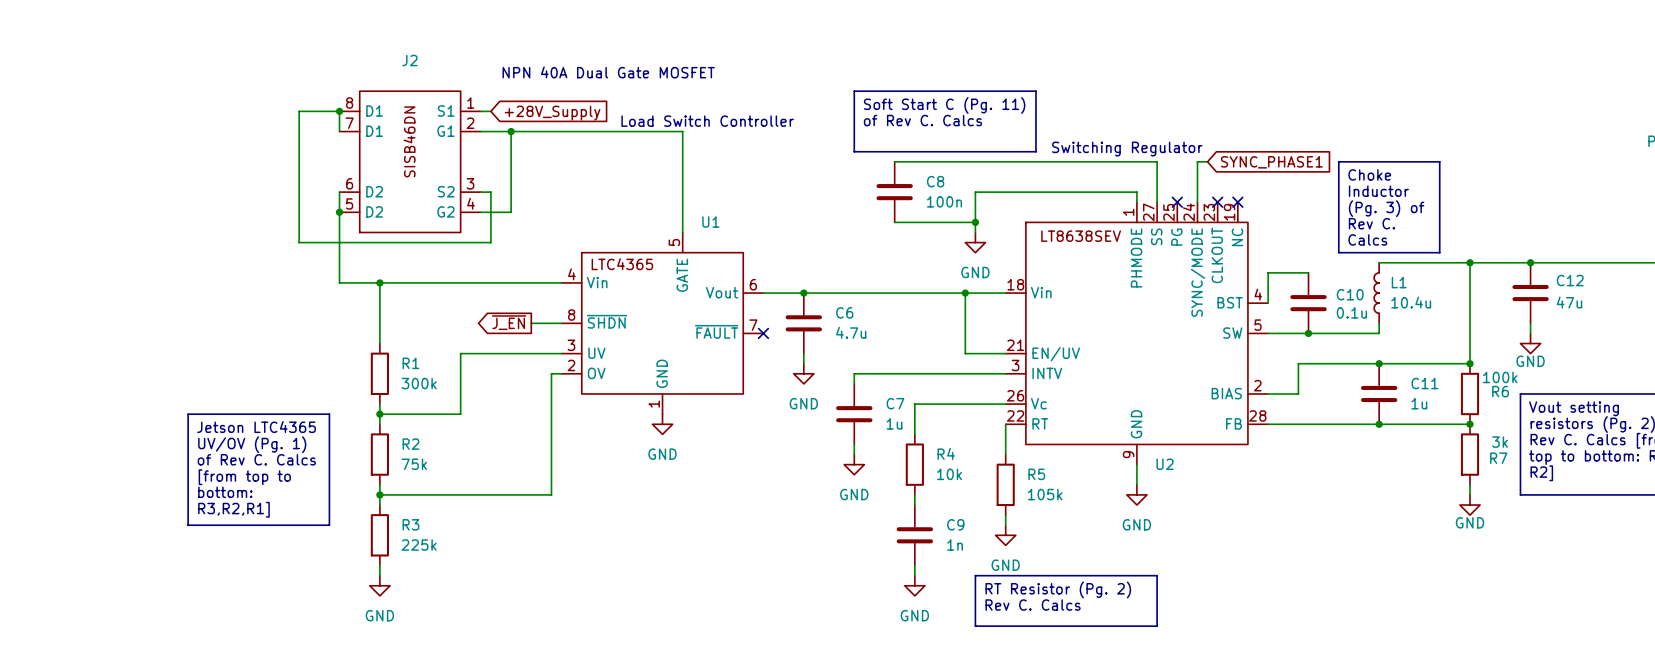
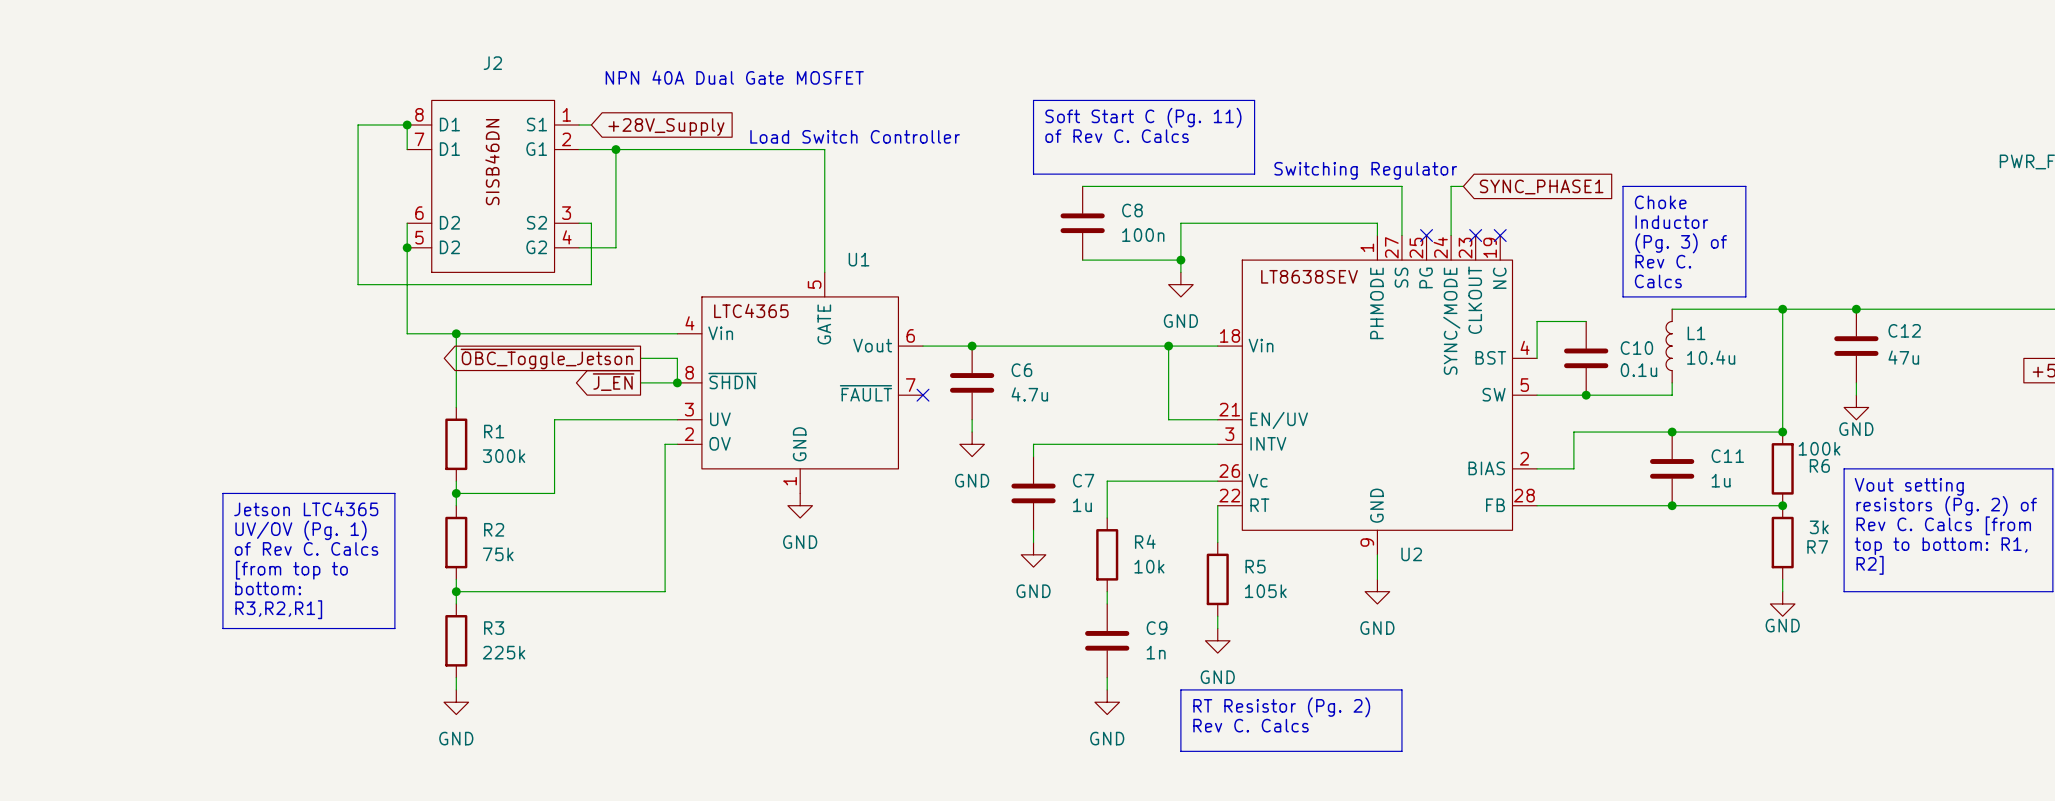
global label: none -> ~{OBC_Toggle_Jetson} (547, 358)
wire: none -> (640, 358) (677, 358) (677, 382)
junction: none -> (677, 382)

